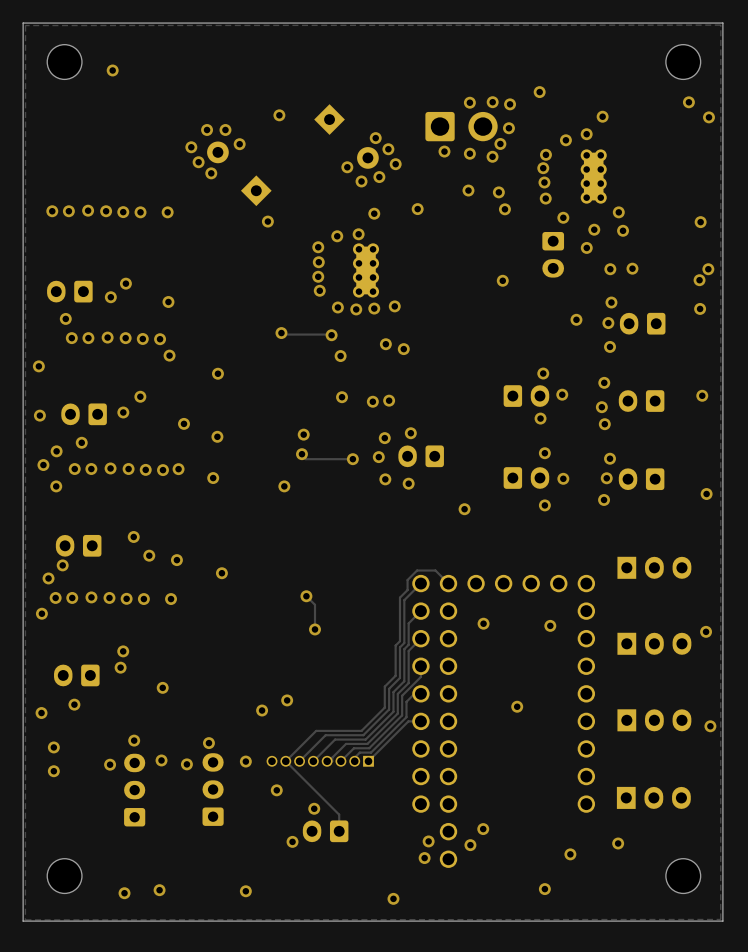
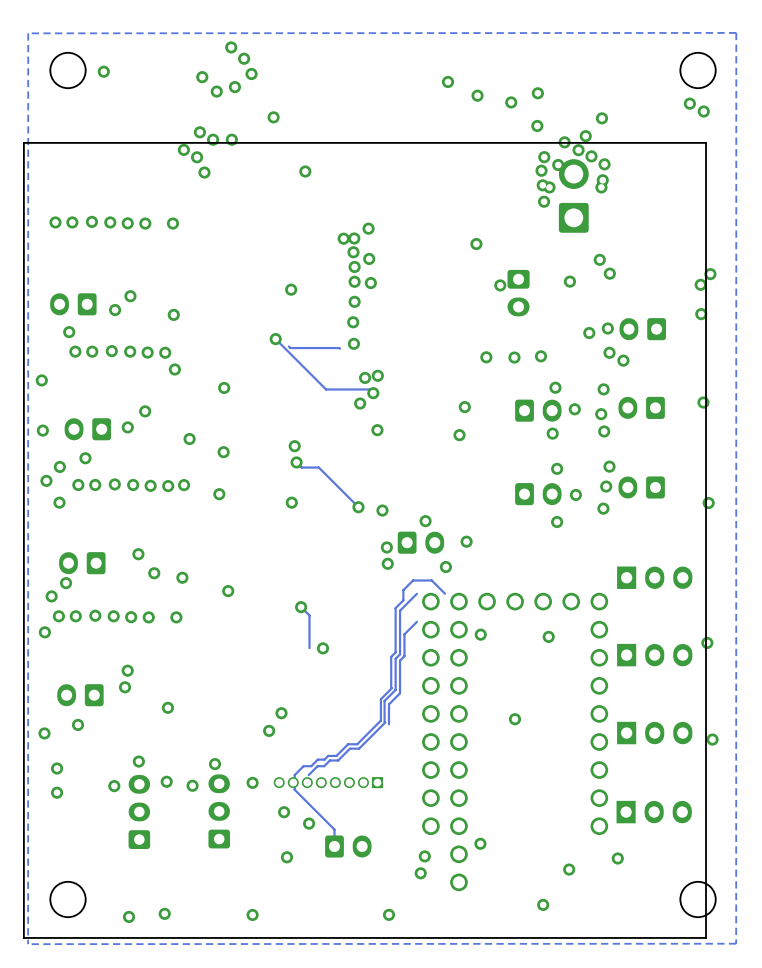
board edge: (722, 23) (23, 23) (23, 921) (722, 921) (722, 23) -> (706, 142) (706, 937) (23, 937) (23, 142) (706, 142)
via: none -> (231, 47)
via: none -> (244, 58)
via: none -> (251, 74)
via: none -> (202, 77)
via position: (112, 70) -> (103, 71)
via: none -> (448, 81)
via: none -> (234, 87)
via: none -> (216, 91)
via: none -> (537, 93)
via: none -> (477, 95)
via: (539, 92) -> none
via: none -> (511, 102)
via: none -> (689, 103)
via: (469, 102) -> none
via: (492, 102) -> none
via: (510, 104) -> none
via: none -> (601, 118)
via position: (279, 115) -> (273, 117)
via: none -> (537, 125)
via: (602, 116) -> none
via: (708, 117) -> none
via: none -> (199, 132)
part rotation: 0° (461, 126) -> 90° counterclockwise (573, 195)
part position: (461, 126) -> (573, 195)
via: none -> (585, 136)
via: (508, 128) -> none
via: none -> (564, 142)
via: (586, 134) -> none
part: (346, 136) -> none
via: (375, 138) -> none
via: none -> (183, 149)
via: (500, 143) -> none
via: (239, 144) -> none
via: none -> (591, 156)
via: none -> (544, 157)
via: (388, 149) -> none
via: (444, 151) -> none
via: (469, 153) -> none
via: none -> (604, 164)
via: (492, 156) -> none
via: none -> (541, 170)
via: none -> (305, 171)
via: (395, 164) -> none
via: (347, 167) -> none
via: (543, 168) -> none
via: none -> (602, 180)
via: (211, 173) -> none
part: (239, 173) -> none
via: none -> (542, 185)
via: none -> (549, 187)
via: none -> (601, 187)
part: (593, 176) -> none
via: (379, 177) -> none
via: (361, 181) -> none
via: (544, 182) -> none
via: (468, 190) -> none
via: none -> (544, 201)
via: (498, 192) -> none
via: (545, 198) -> none
via: (417, 209) -> none
via: (504, 209) -> none
via: (618, 212) -> none
via: (374, 213) -> none
via: none -> (368, 228)
via: (563, 217) -> none
via: (267, 221) -> none
via: (700, 222) -> none
via: none -> (343, 238)
via: none -> (354, 238)
via: (594, 229) -> none
via: (623, 230) -> none
via: none -> (476, 244)
via: (358, 234) -> none
via: (337, 236) -> none
via: none -> (353, 252)
via: (318, 247) -> none
via: none -> (369, 258)
via: none -> (354, 266)
part: (553, 254) -> none
via: none -> (710, 274)
via: (318, 262) -> none
via: (632, 268) -> none
via: none -> (354, 281)
via: none -> (569, 281)
via position: (610, 269) -> (609, 273)
via: (708, 269) -> none
via: none -> (370, 283)
part: (366, 270) -> none
via: none -> (700, 284)
via: (318, 276) -> none
via: none -> (291, 289)
via position: (502, 280) -> (500, 285)
part: none -> (518, 293)
via: (699, 280) -> none
via: none -> (354, 301)
via: (319, 290) -> none
via: none -> (701, 314)
via: (611, 302) -> none
via: (394, 306) -> none
via: (337, 307) -> none
via: (374, 308) -> none
via: (700, 308) -> none
via: none -> (353, 322)
via: (356, 309) -> none
via: none -> (607, 328)
via: (608, 323) -> none
part position: (642, 323) -> (642, 329)
track: none -> (275, 339) (326, 389) (369, 389) (373, 393)
via: none -> (353, 343)
via position: (281, 333) -> (275, 339)
via: (331, 335) -> none
via: none -> (609, 352)
via: none -> (540, 356)
via: none -> (486, 357)
via: none -> (514, 357)
via: (385, 344) -> none
via: (403, 349) -> none
via: (340, 356) -> none
via: none -> (377, 375)
via: none -> (365, 377)
via: none -> (603, 389)
via: none -> (373, 393)
via: (604, 382) -> none
via: none -> (360, 403)
via: none -> (464, 407)
via position: (702, 395) -> (703, 402)
via: (342, 397) -> none
via: none -> (601, 414)
via: (389, 400) -> none
via: (372, 401) -> none
part position: (641, 401) -> (641, 407)
via: (601, 407) -> none
via: none -> (377, 430)
via: none -> (604, 431)
via: none -> (459, 435)
via: (604, 424) -> none
via: none -> (294, 446)
via: (410, 433) -> none
via: (303, 434) -> none
via: (384, 438) -> none
track: none -> (296, 462) (301, 467) (318, 467) (358, 507)
via: none -> (296, 462)
via: none -> (609, 466)
track: (301, 454) (305, 459) (352, 459) -> none
via: (301, 454) -> none
part rotation: 0° (421, 456) -> 180° (420, 542)
part position: (421, 456) -> (420, 542)
via: (378, 457) -> none
via: (610, 458) -> none
via: (352, 459) -> none
via: none -> (606, 486)
via: (606, 478) -> none
via: (385, 479) -> none
part position: (641, 479) -> (641, 487)
via: (408, 483) -> none
via: none -> (358, 507)
via: none -> (603, 508)
via: none -> (382, 510)
via position: (706, 494) -> (708, 503)
via: (604, 499) -> none
via: none -> (425, 521)
via position: (464, 509) -> (466, 541)
via: none -> (386, 547)
via: none -> (387, 563)
via: none -> (445, 567)
part position: (654, 567) -> (654, 577)
track: none -> (416, 593) (400, 610) (400, 654) (395, 658) (395, 689) (384, 700) (384, 721)
track: none -> (445, 593) (431, 580) (413, 580) (403, 590) (403, 600) (395, 608) (395, 652) (391, 656) (391, 687)
track: (420, 583) (404, 600) (404, 643) (399, 647) (399, 677) (389, 688) (389, 709) (363, 735) (325, 735) (299, 761) -> none
track: (448, 583) (435, 570) (417, 570) (407, 580) (407, 590) (399, 597) (399, 641) (395, 645) (395, 675) (384, 686) (384, 707) (361, 730) (316, 730) (285, 761) (339, 814) (339, 831) -> none
track: none -> (301, 607) (309, 615) (309, 648)
track: (306, 596) (315, 604) (315, 629) -> none
via position: (306, 596) -> (301, 607)
track: none -> (416, 621) (404, 634) (404, 656) (400, 660) (400, 693) (388, 704) (388, 724)
track: (420, 611) (408, 623) (408, 644) (404, 649) (404, 681) (393, 692) (393, 711) (365, 739) (335, 739) (313, 761) -> none
via position: (483, 623) -> (480, 634)
via position: (550, 625) -> (548, 636)
via position: (706, 631) -> (707, 642)
track: (420, 638) (408, 650) (408, 683) (397, 693) (397, 713) (367, 743) (346, 743) (332, 757) (332, 761) (327, 761) -> none
part position: (654, 643) -> (654, 655)
track: (420, 666) (420, 676) (402, 695) (402, 715) (369, 748) (353, 748) (340, 761) -> none
track: none -> (391, 688) (380, 699) (380, 720) (357, 744) (348, 744) (336, 755) (328, 755) (324, 759) (317, 759) (311, 766) (303, 766) (294, 775) (294, 789) (334, 829) (334, 846)
track: (420, 693) (414, 693) (406, 701) (406, 717) (371, 752) (359, 752) (354, 757) (354, 761) -> none
via position: (287, 700) -> (281, 713)
track: none -> (385, 722) (359, 748) (349, 748) (338, 760) (329, 760) (324, 766) (317, 766) (308, 775)
via position: (517, 706) -> (515, 719)
part position: (654, 720) -> (654, 733)
track: (420, 721) (408, 721) (368, 761) -> none
via position: (710, 726) -> (712, 739)
part position: (653, 797) -> (654, 812)
via position: (314, 808) -> (309, 823)
via: none -> (480, 843)
via: (483, 829) -> none
part rotation: 0° (325, 831) -> 180° (348, 846)
via: none -> (424, 856)
via position: (292, 841) -> (286, 857)
via: (428, 841) -> none
via position: (618, 843) -> (617, 858)
via: (470, 845) -> none
via: none -> (420, 873)
via position: (570, 854) -> (569, 869)
via: (424, 858) -> none
via position: (544, 889) -> (543, 904)
via position: (393, 898) -> (388, 914)

